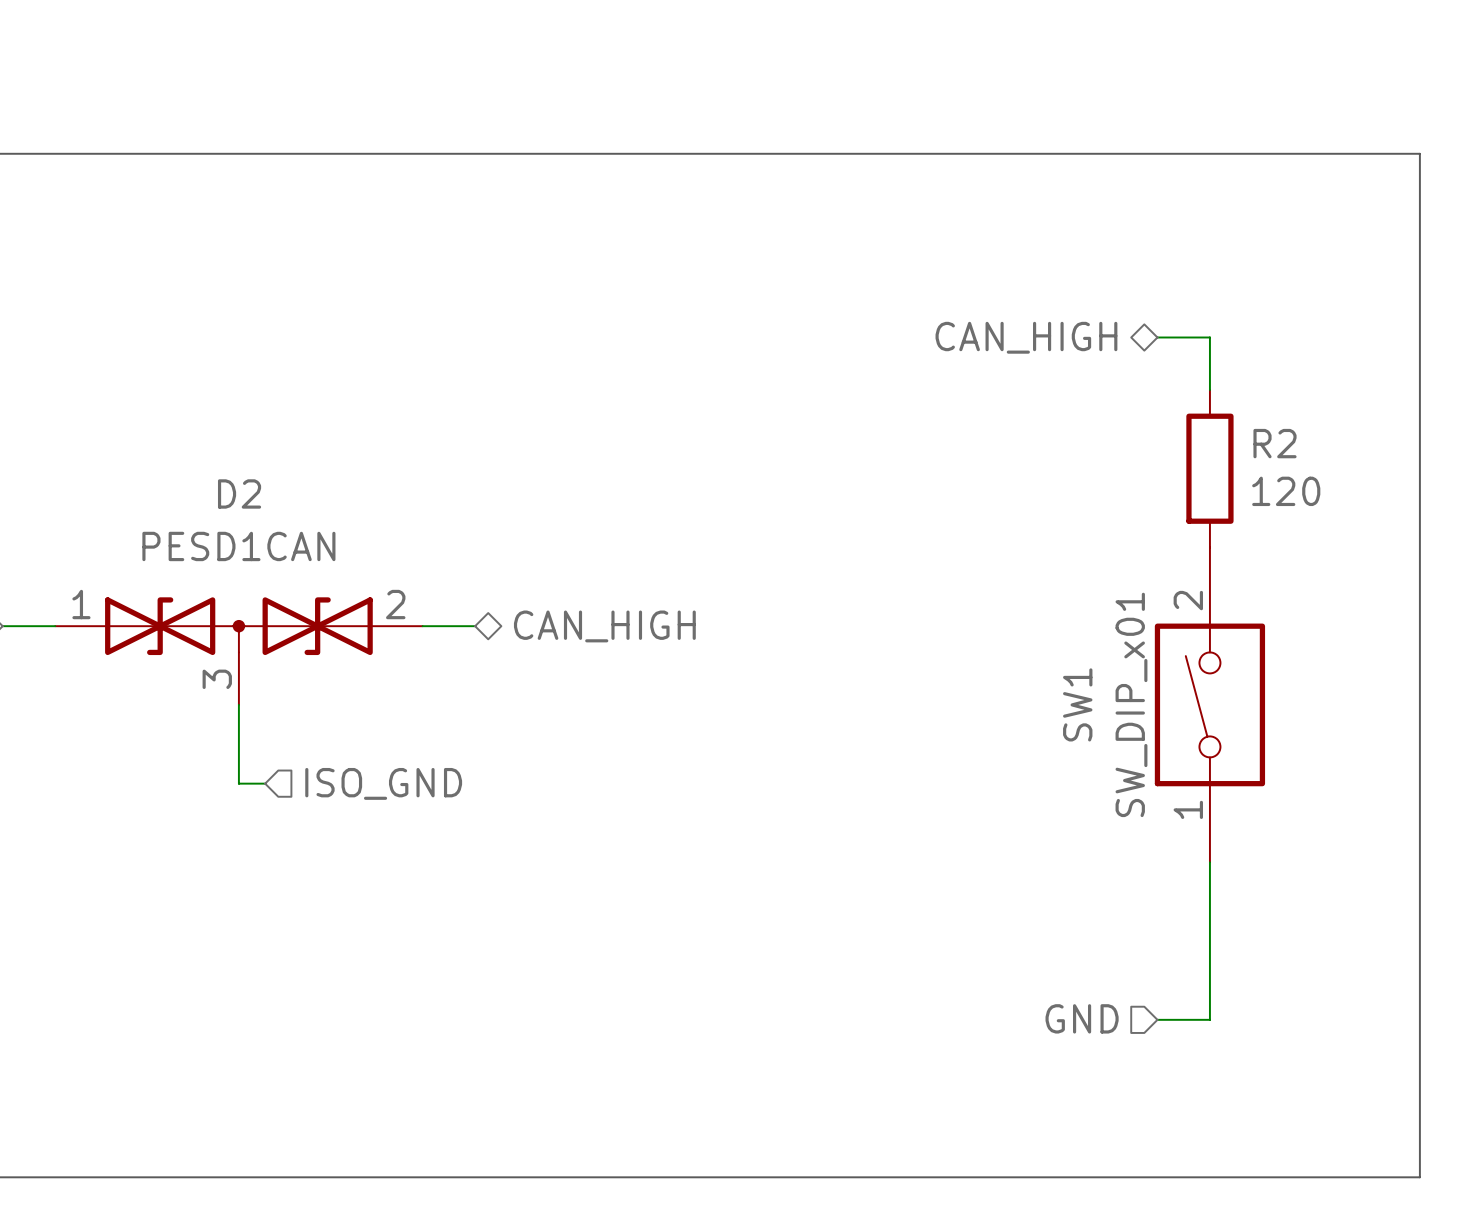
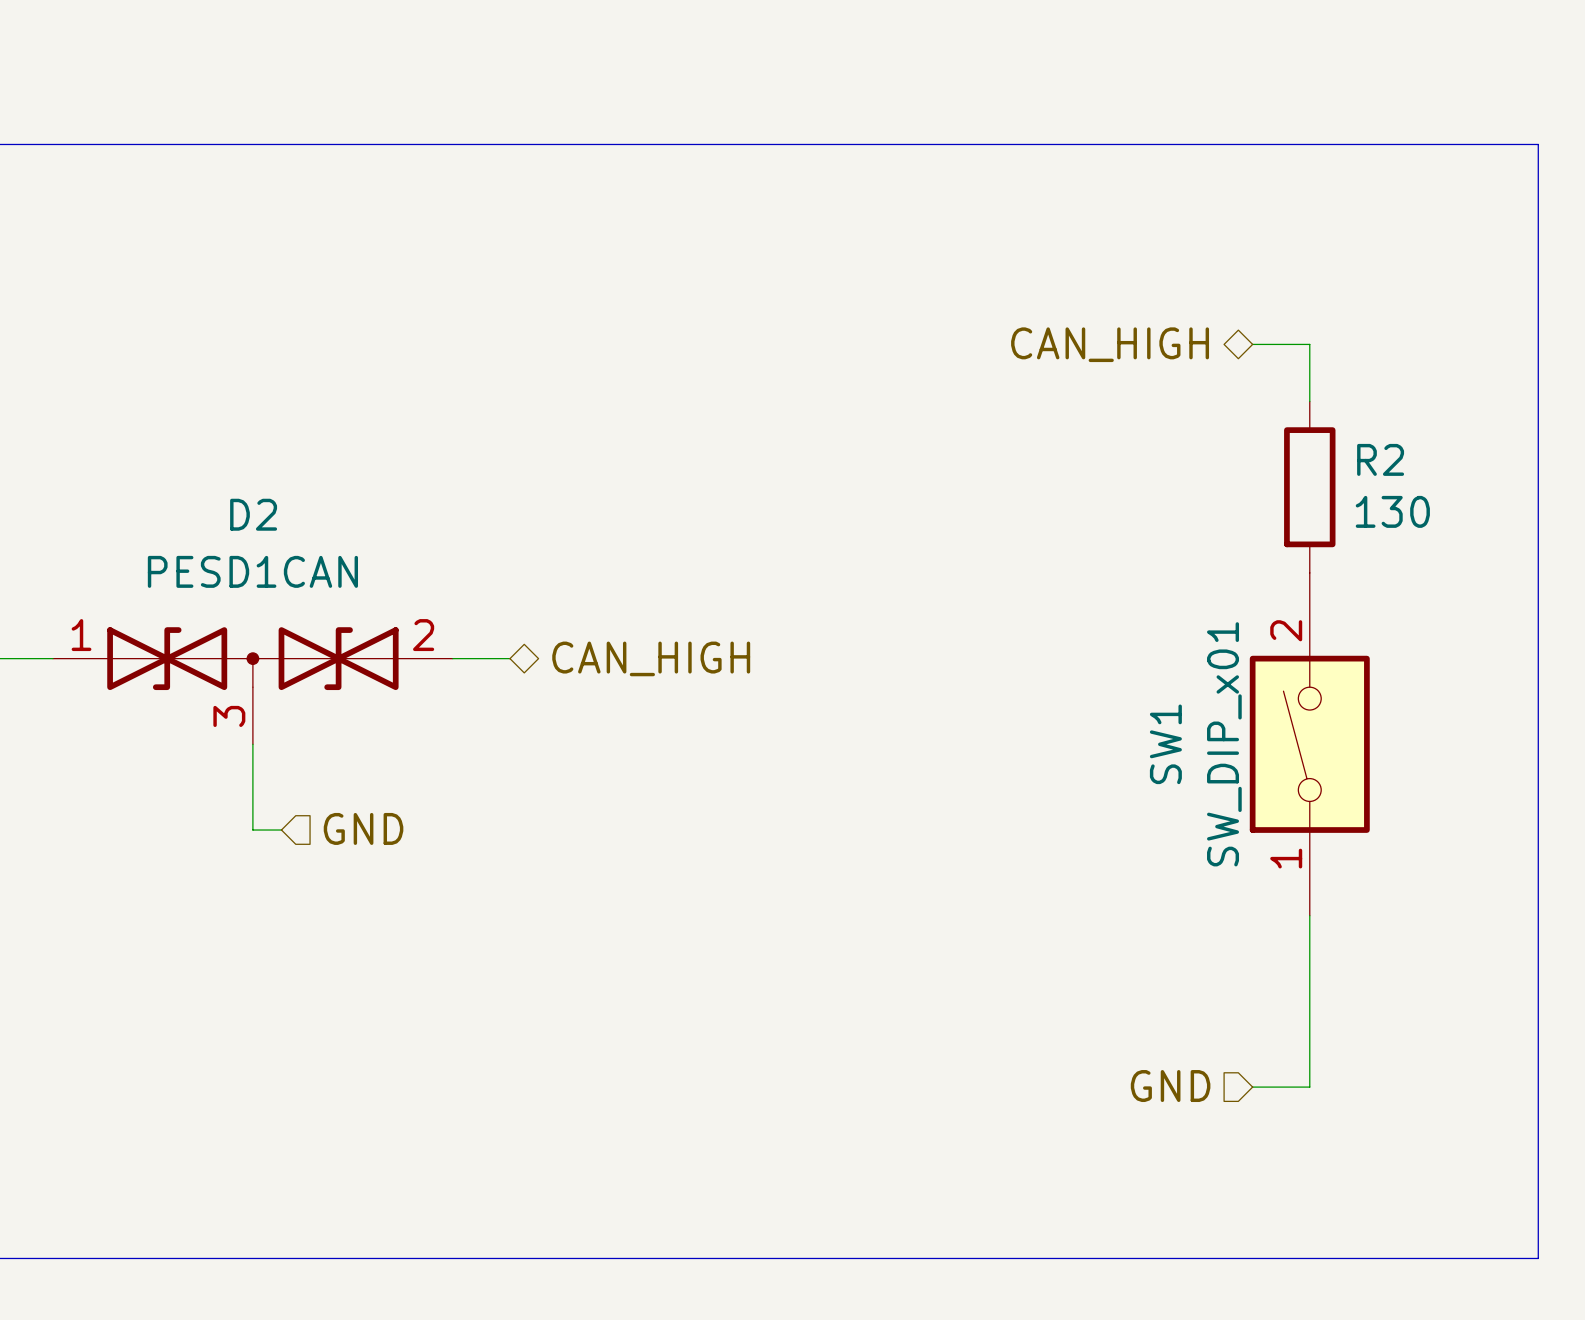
R2 value: 120 (1286, 491) -> 130 (1392, 511)
hierarchical label: ISO_GND (383, 783) -> GND (363, 828)

